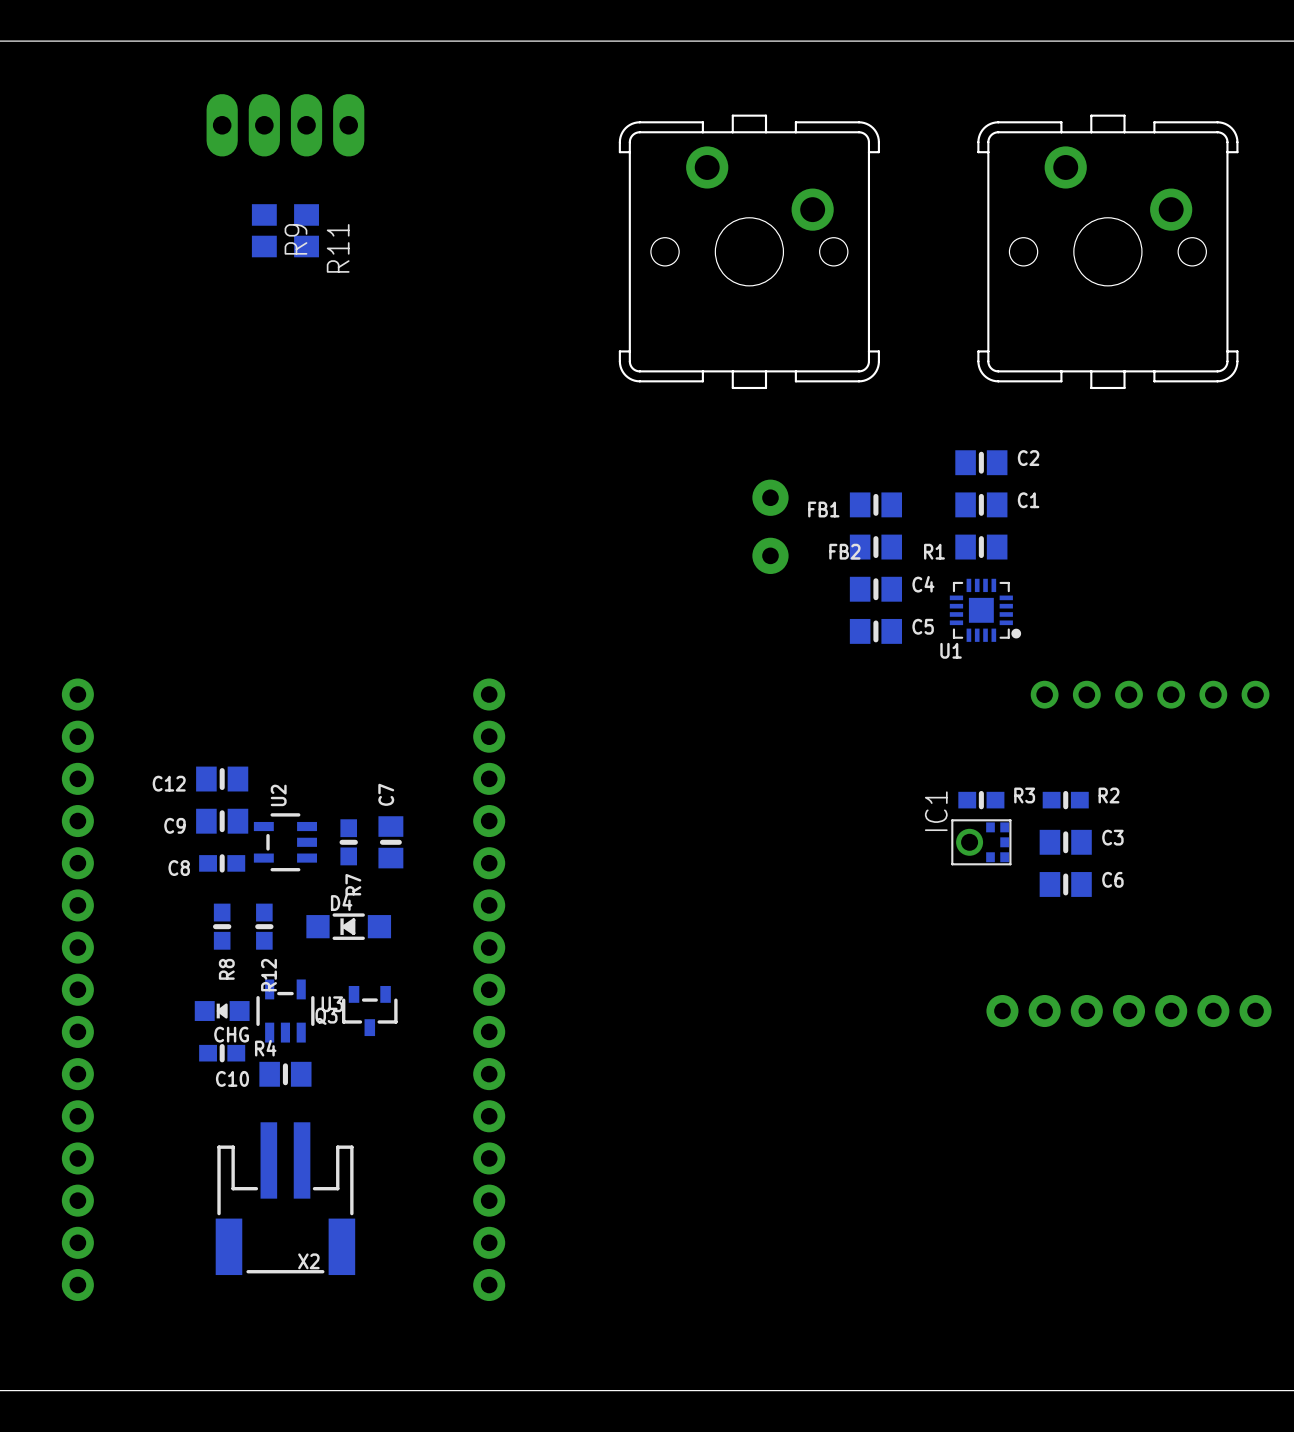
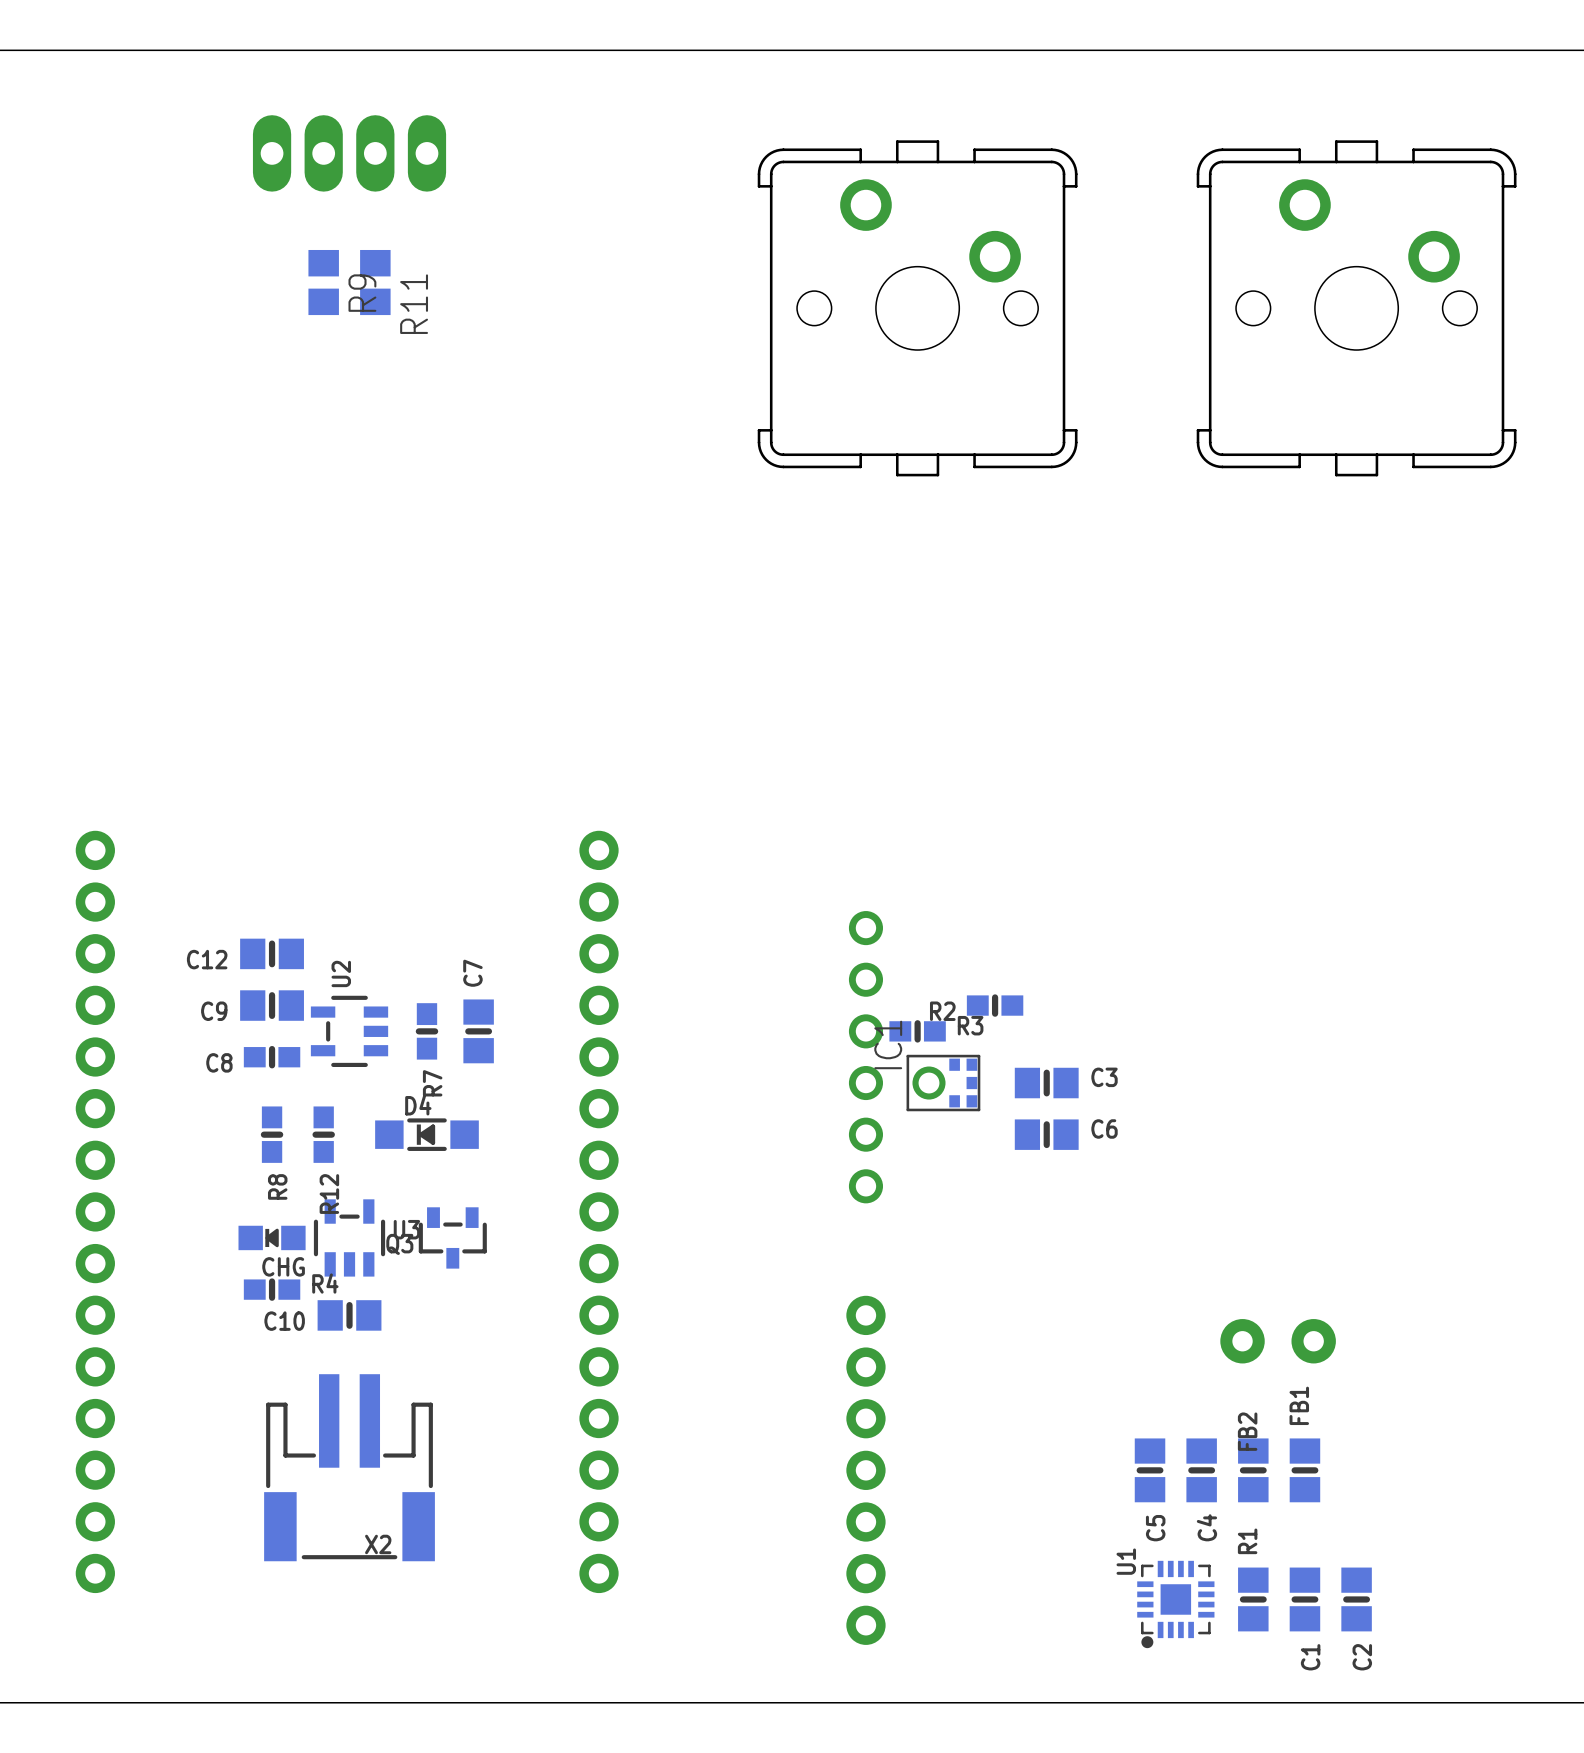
C2 rotation: 0° (981, 462) -> 90° clockwise (1356, 1599)
C2 position: (981, 462) -> (1356, 1599)
FB1 rotation: 0° (875, 504) -> 90° clockwise (1304, 1470)
FB1 position: (875, 504) -> (1304, 1470)
C1 rotation: 0° (981, 504) -> 90° clockwise (1304, 1599)
C1 position: (981, 504) -> (1304, 1599)
part: (770, 526) -> none
FB2 rotation: 0° (875, 547) -> 90° clockwise (1253, 1470)
FB2 position: (875, 547) -> (1253, 1470)
R1 rotation: 0° (981, 547) -> 90° clockwise (1253, 1599)
R1 position: (981, 547) -> (1253, 1599)
C4 rotation: 0° (875, 589) -> 90° clockwise (1201, 1470)
C4 position: (875, 589) -> (1201, 1470)
U1 rotation: 0° (985, 610) -> 90° clockwise (1175, 1604)
U1 position: (985, 610) -> (1175, 1604)
C5 rotation: 0° (875, 631) -> 90° clockwise (1150, 1470)
C5 position: (875, 631) -> (1150, 1470)
part: (1150, 694) -> none
R2 name position: R2 (1108, 795) -> R2 (942, 1011)
R3 position: (981, 800) -> (917, 1031)
R2 position: (1065, 800) -> (995, 1005)
IC1 position: (981, 842) -> (943, 1083)
C3 position: (1065, 842) -> (1046, 1083)
part: none -> (865, 1057)
C6 position: (1065, 884) -> (1046, 1134)
part: (1128, 1011) -> none
part: none -> (1278, 1341)
part: none -> (865, 1470)

